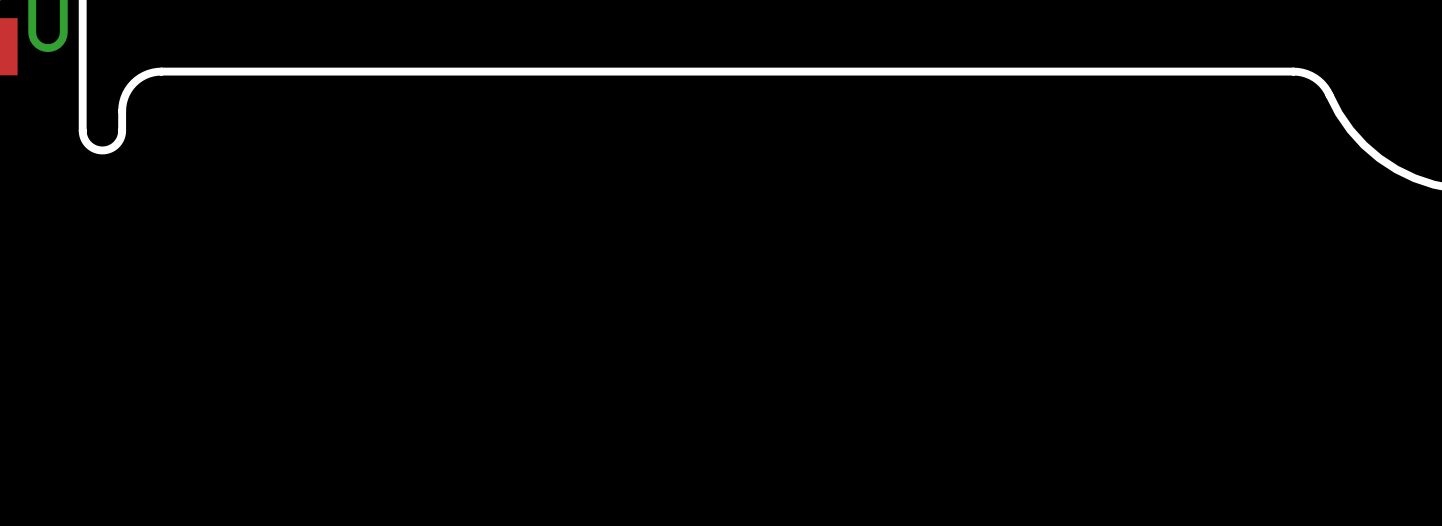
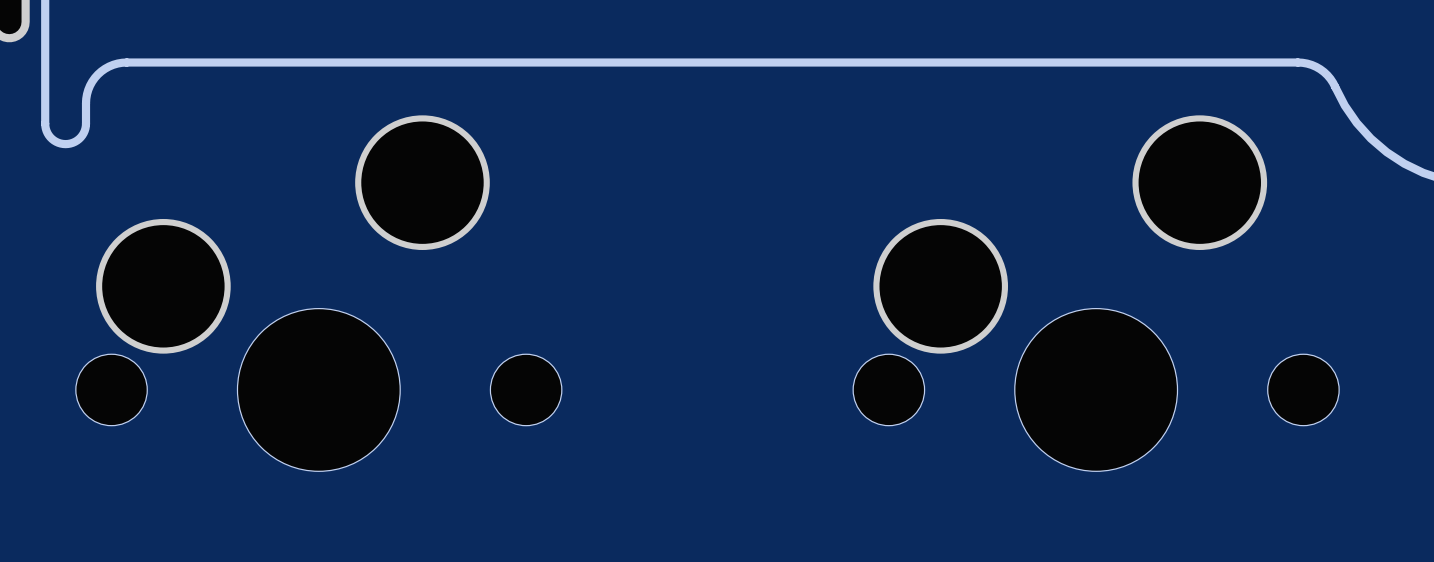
part: none -> (318, 293)
part: none -> (1096, 293)

